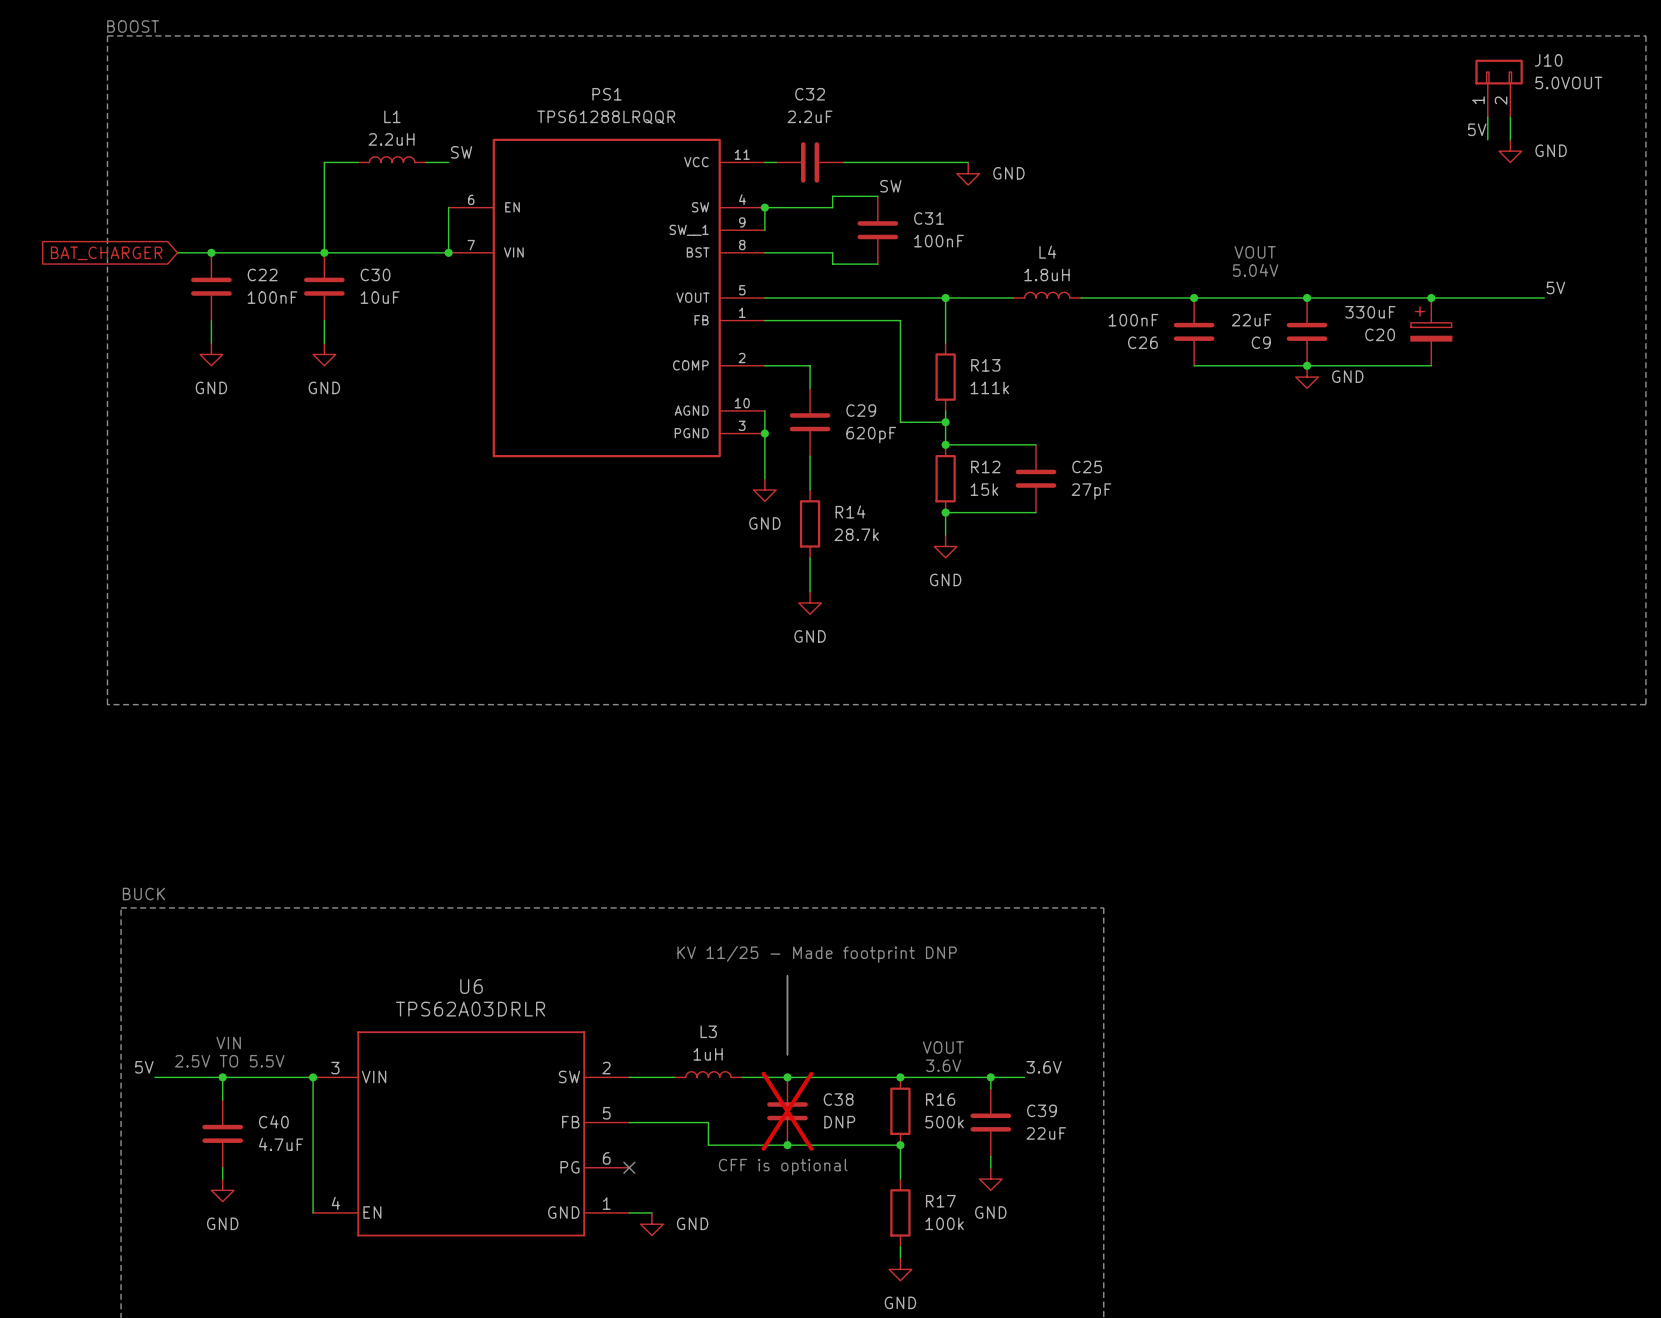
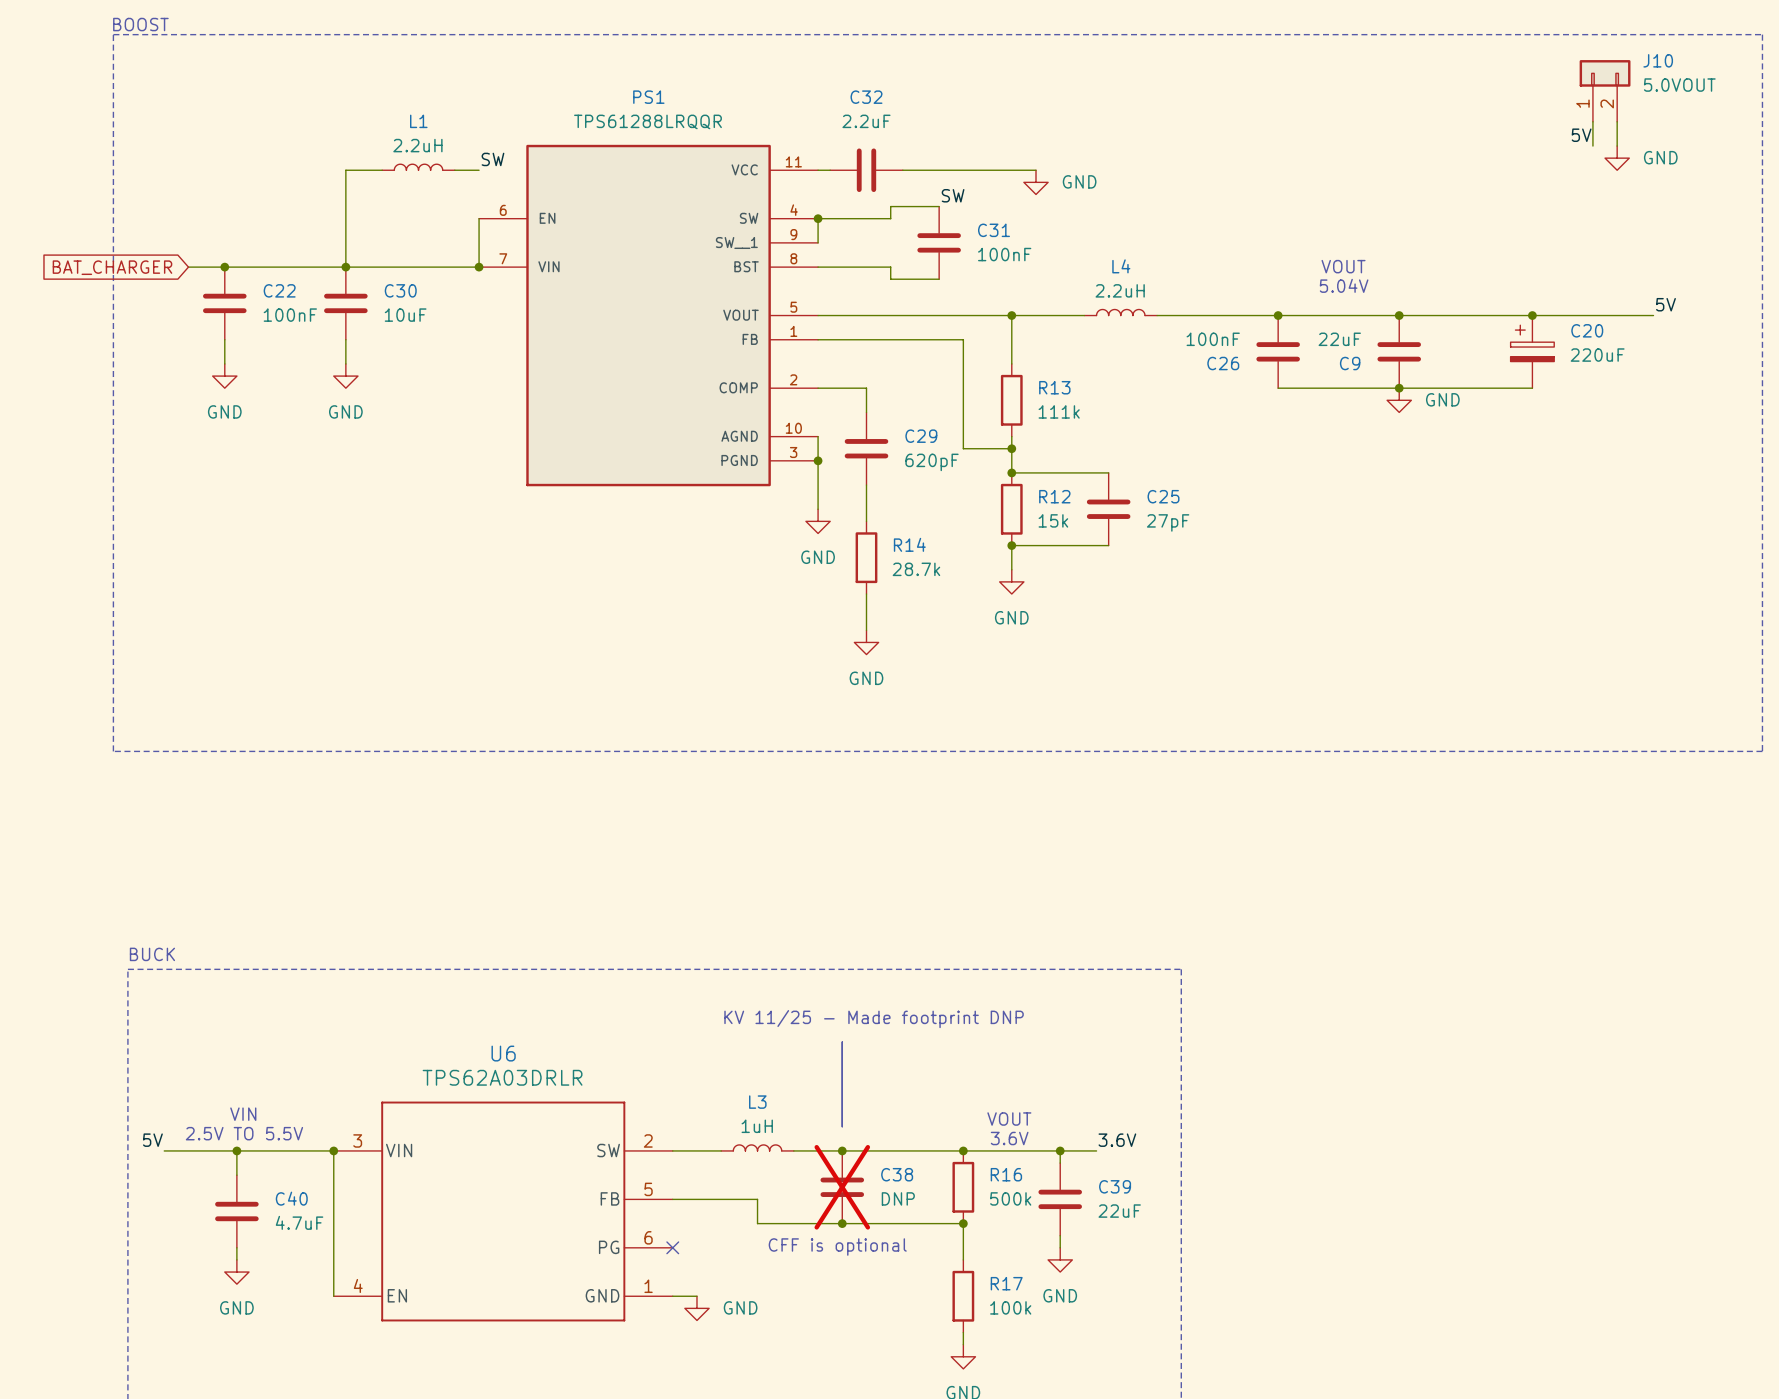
L4 value: 1.8uH (1047, 274) -> 2.2uH (1120, 290)
C20 value: 330uF (1370, 312) -> 220uF (1597, 355)
C20 name position: C20 (1380, 334) -> C20 (1587, 330)

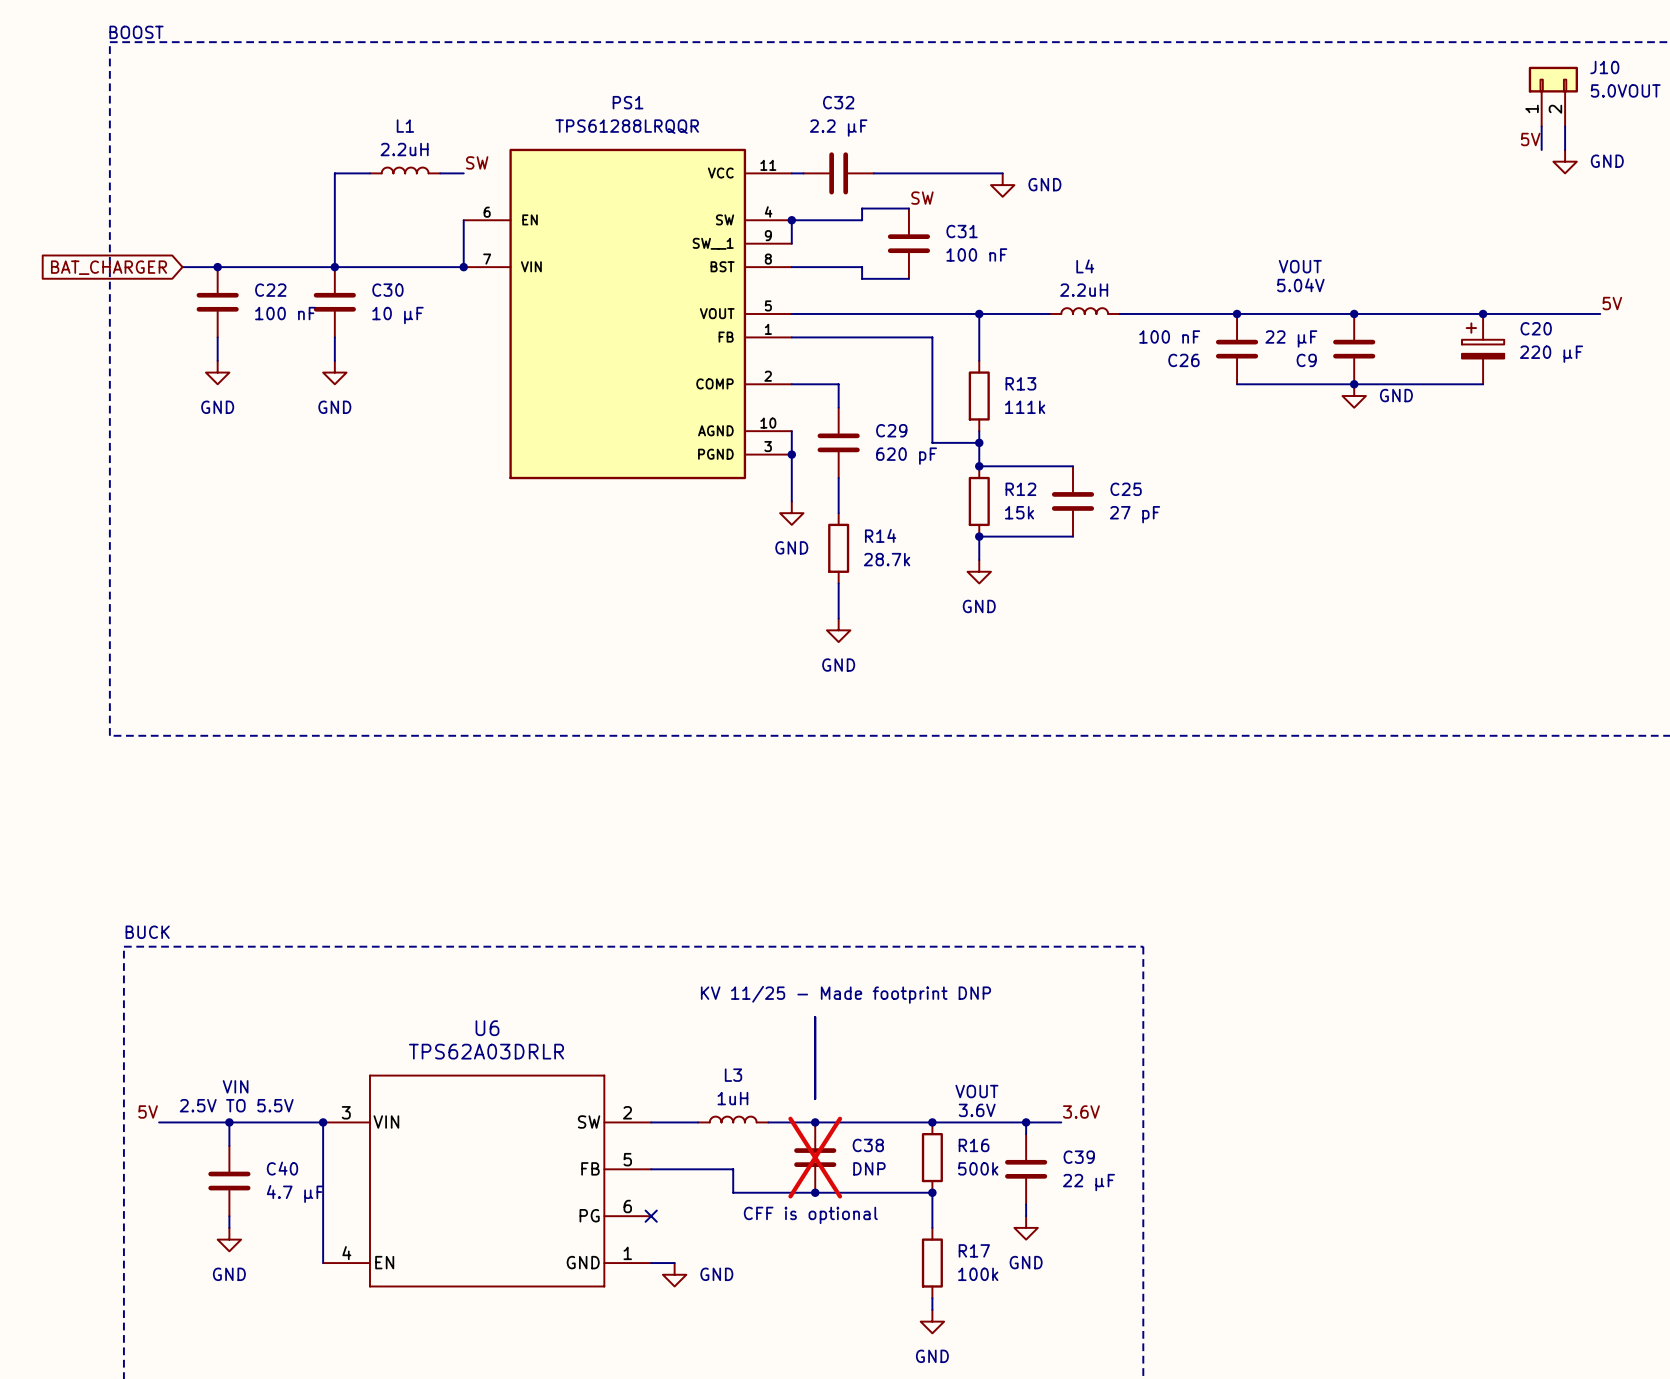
C32 value: 2.2uF (866, 121) -> 2.2 µF (838, 128)
C31 value: 100nF (1004, 254) -> 100 nF (976, 254)
C22 value: 100nF (290, 315) -> 100 nF (285, 313)
C30 value: 10uF (405, 315) -> 10 µF (397, 315)
C26 value: 100nF (1213, 339) -> 100 nF (1169, 336)
C9 value: 22uF (1339, 339) -> 22 µF (1291, 338)
C20 value: 220uF (1597, 355) -> 220 µF (1551, 354)
C29 value: 620pF (932, 462) -> 620 pF (906, 456)
C25 value: 27pF (1168, 522) -> 27 pF (1135, 514)
C39 value: 22uF (1119, 1211) -> 22 µF (1088, 1182)
C40 value: 4.7uF (299, 1222) -> 4.7 µF (295, 1193)

